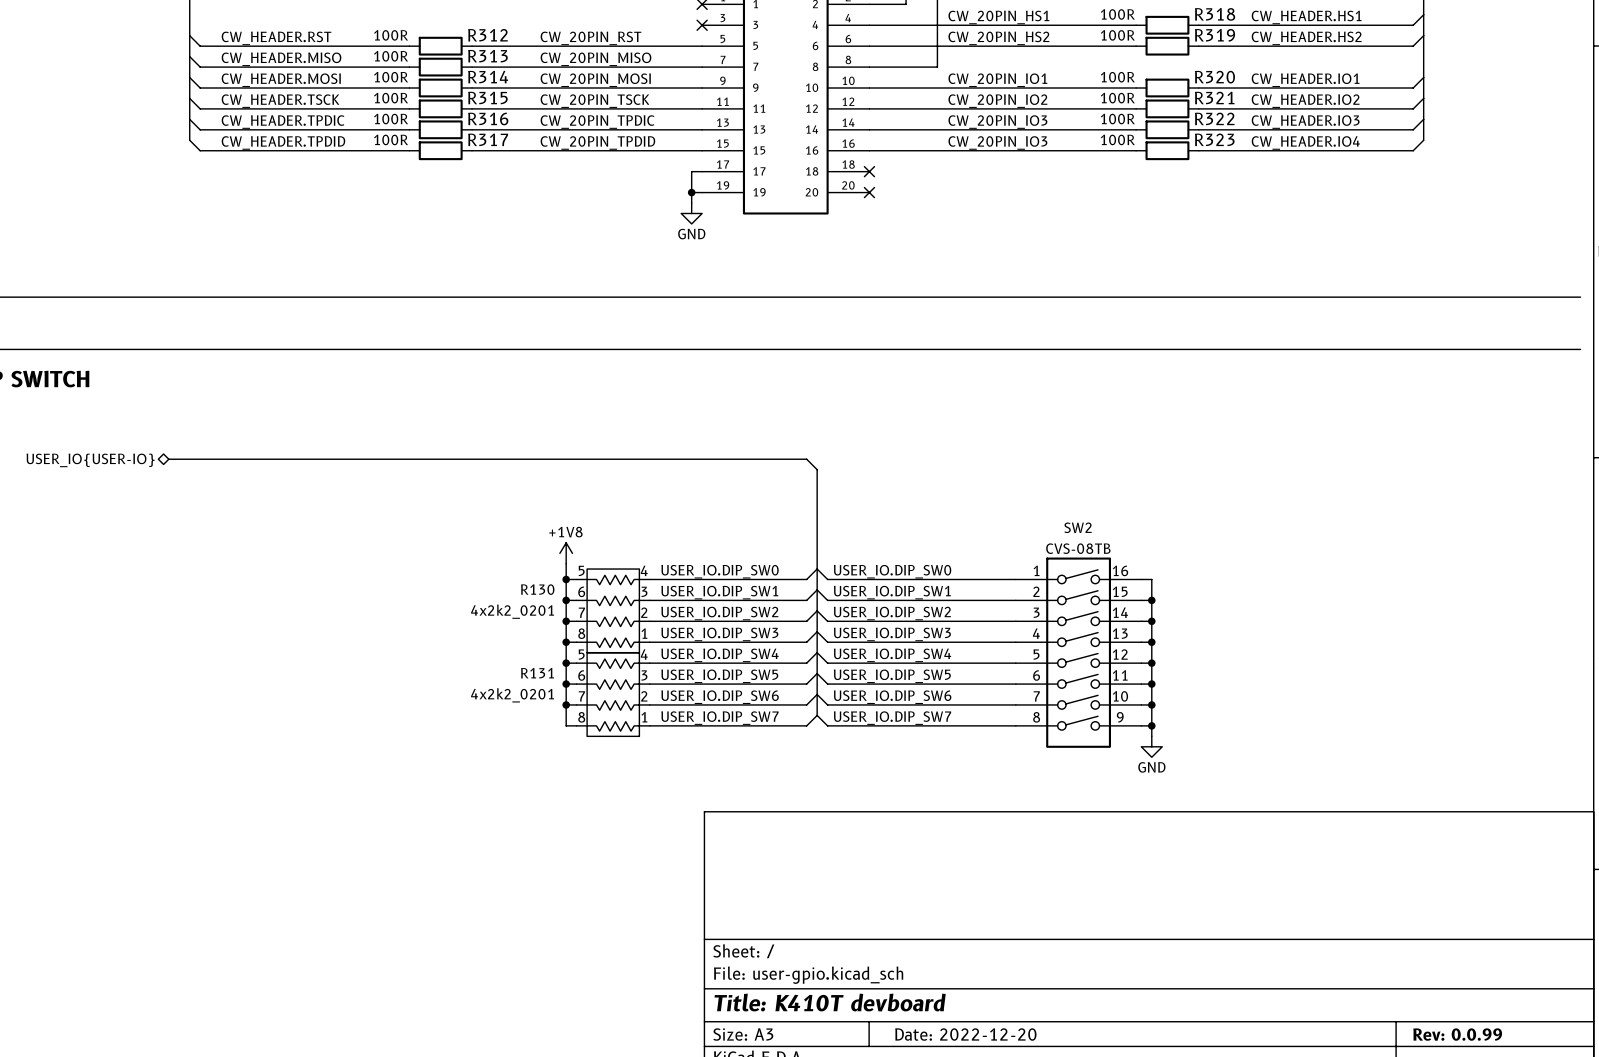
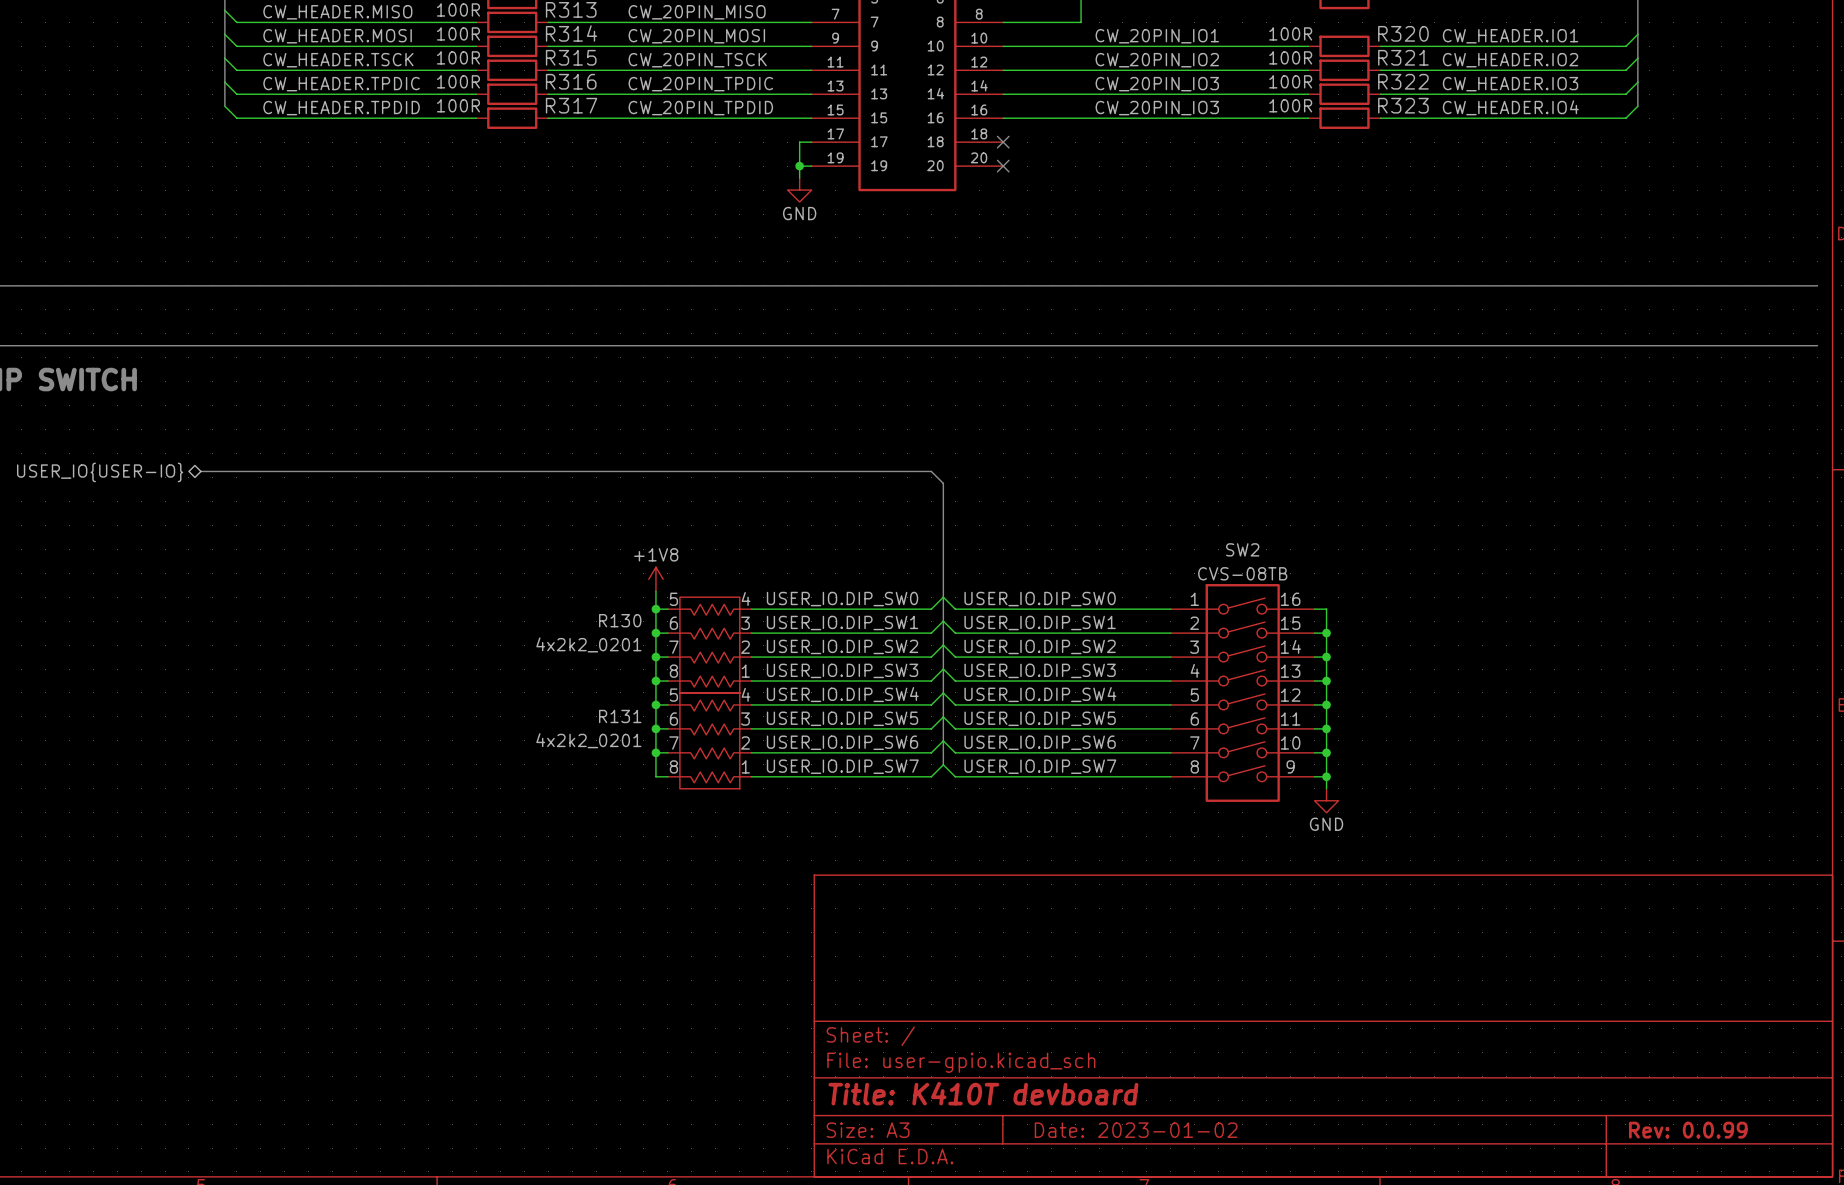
title block: Date: 2022-12-20 (965, 1034) -> Date: 2023-01-02 (1136, 1130)

